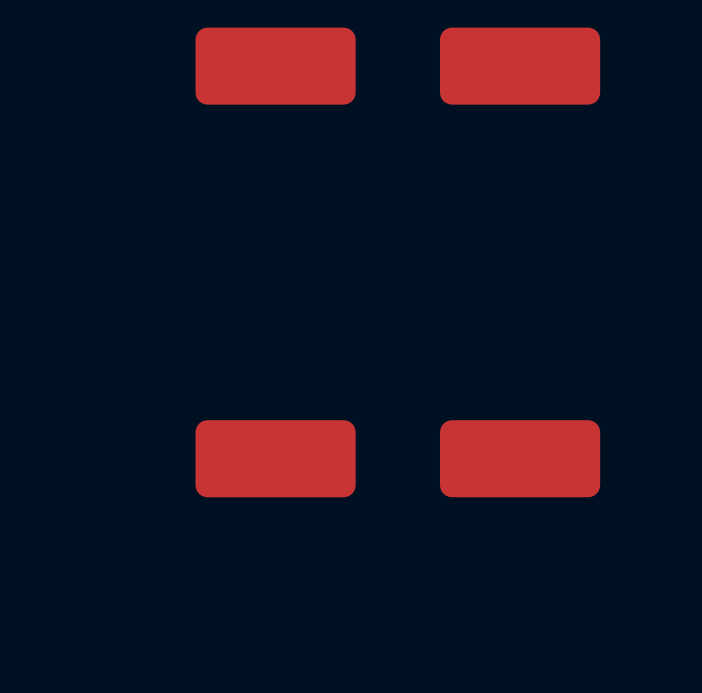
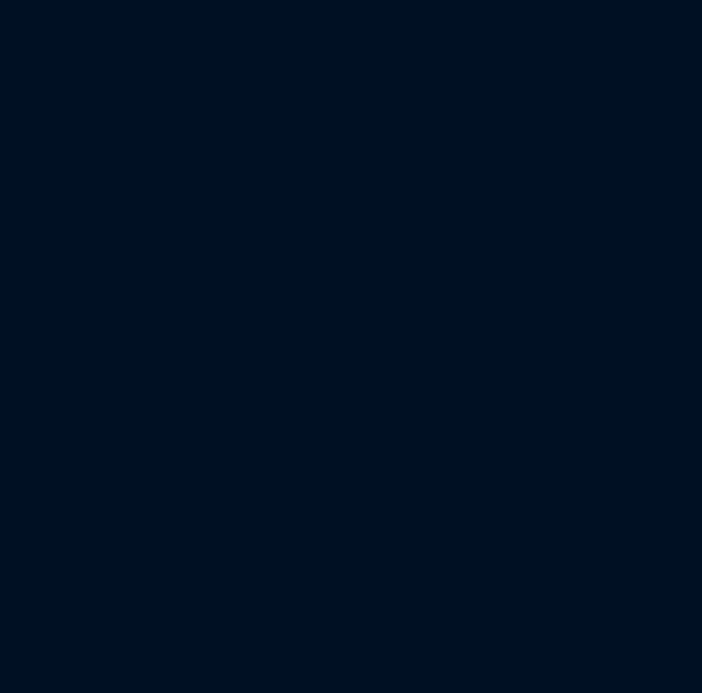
part: (397, 66) -> none
part: (397, 458) -> none

